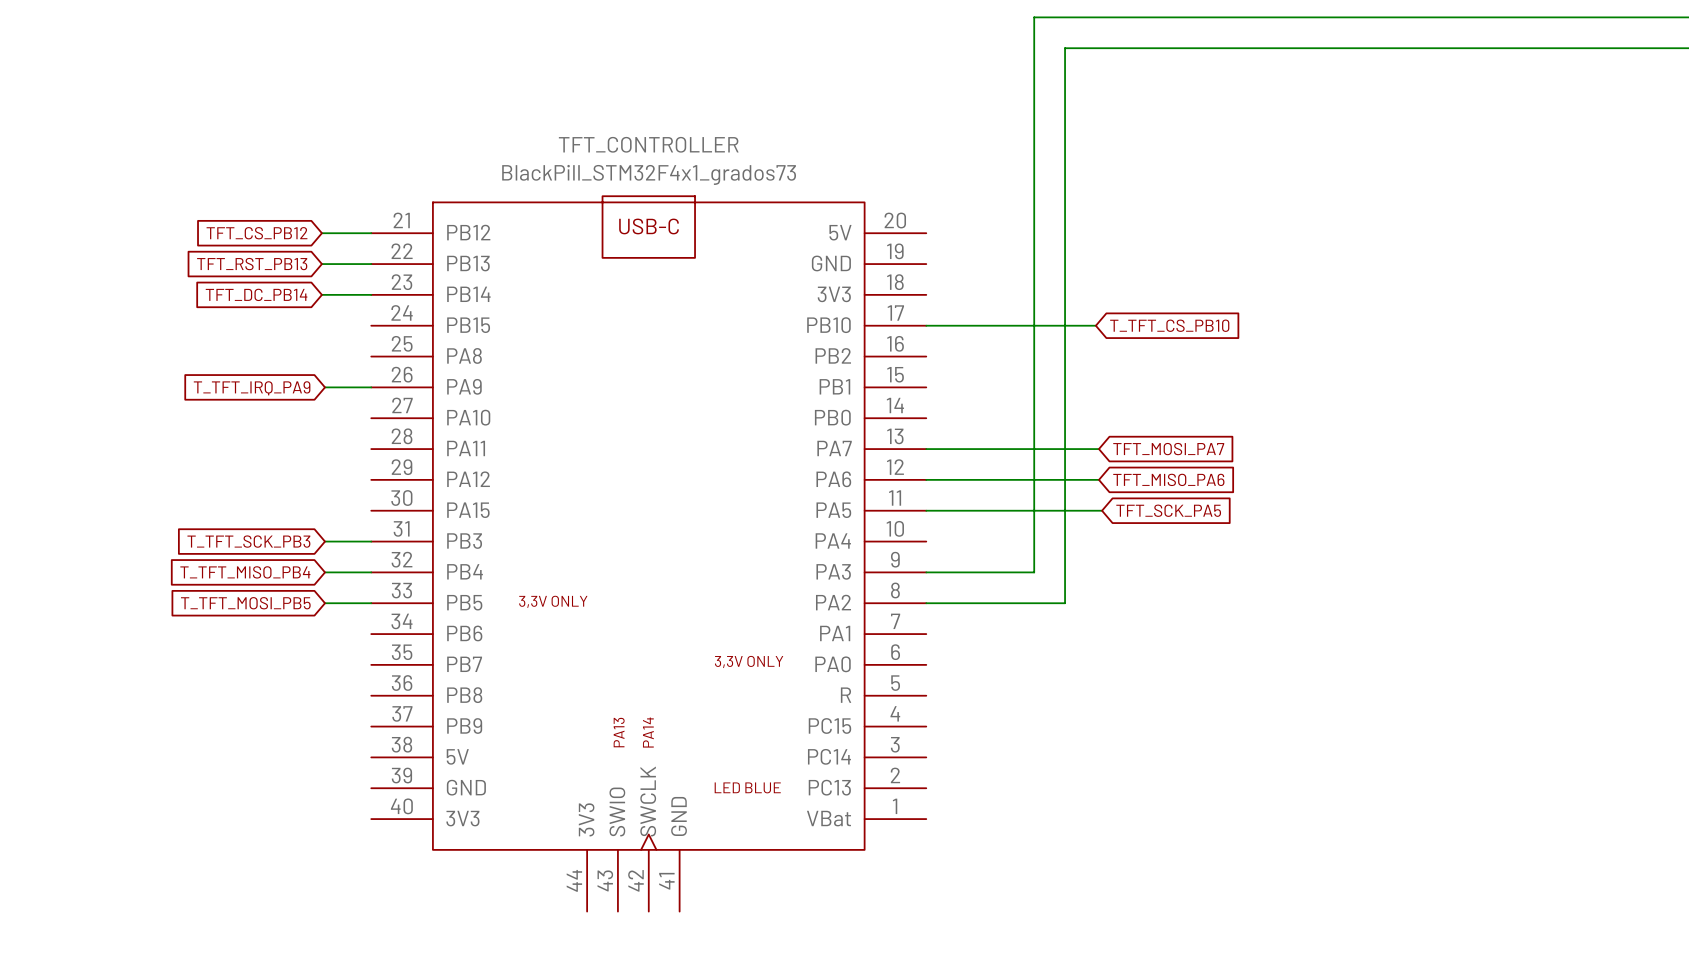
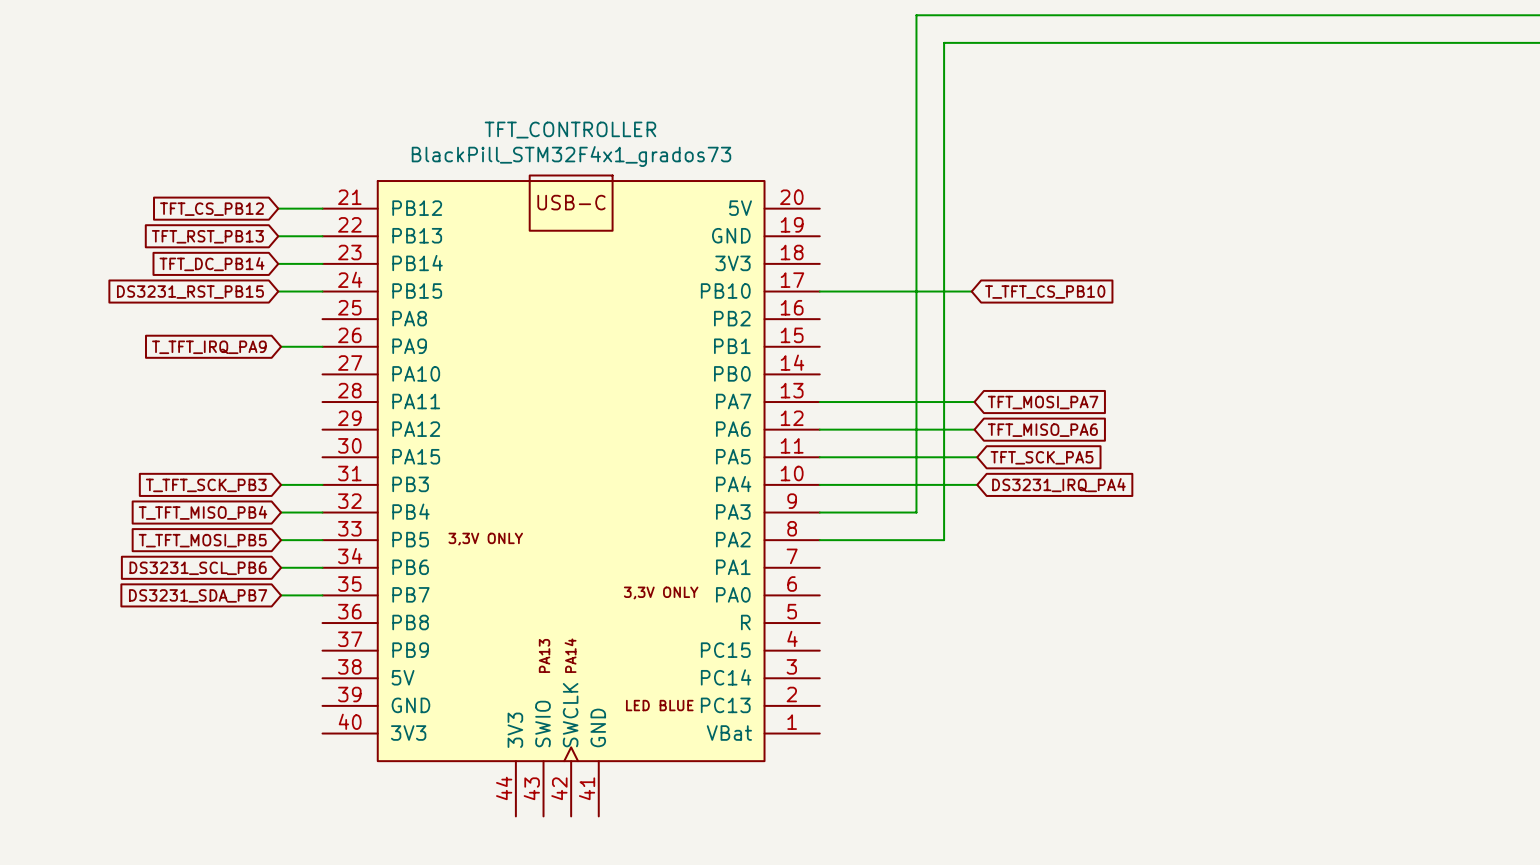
global label: none -> DS3231_RST_PB15 (190, 292)
wire: none -> (278, 291) (322, 291)
wire: none -> (819, 484) (977, 484)
global label: none -> DS3231_IRQ_PA4 (1058, 485)
global label: none -> DS3231_SCL_PB6 (198, 568)
wire: none -> (281, 567) (322, 567)
global label: none -> DS3231_SDA_PB7 (198, 595)
wire: none -> (281, 595) (322, 595)

